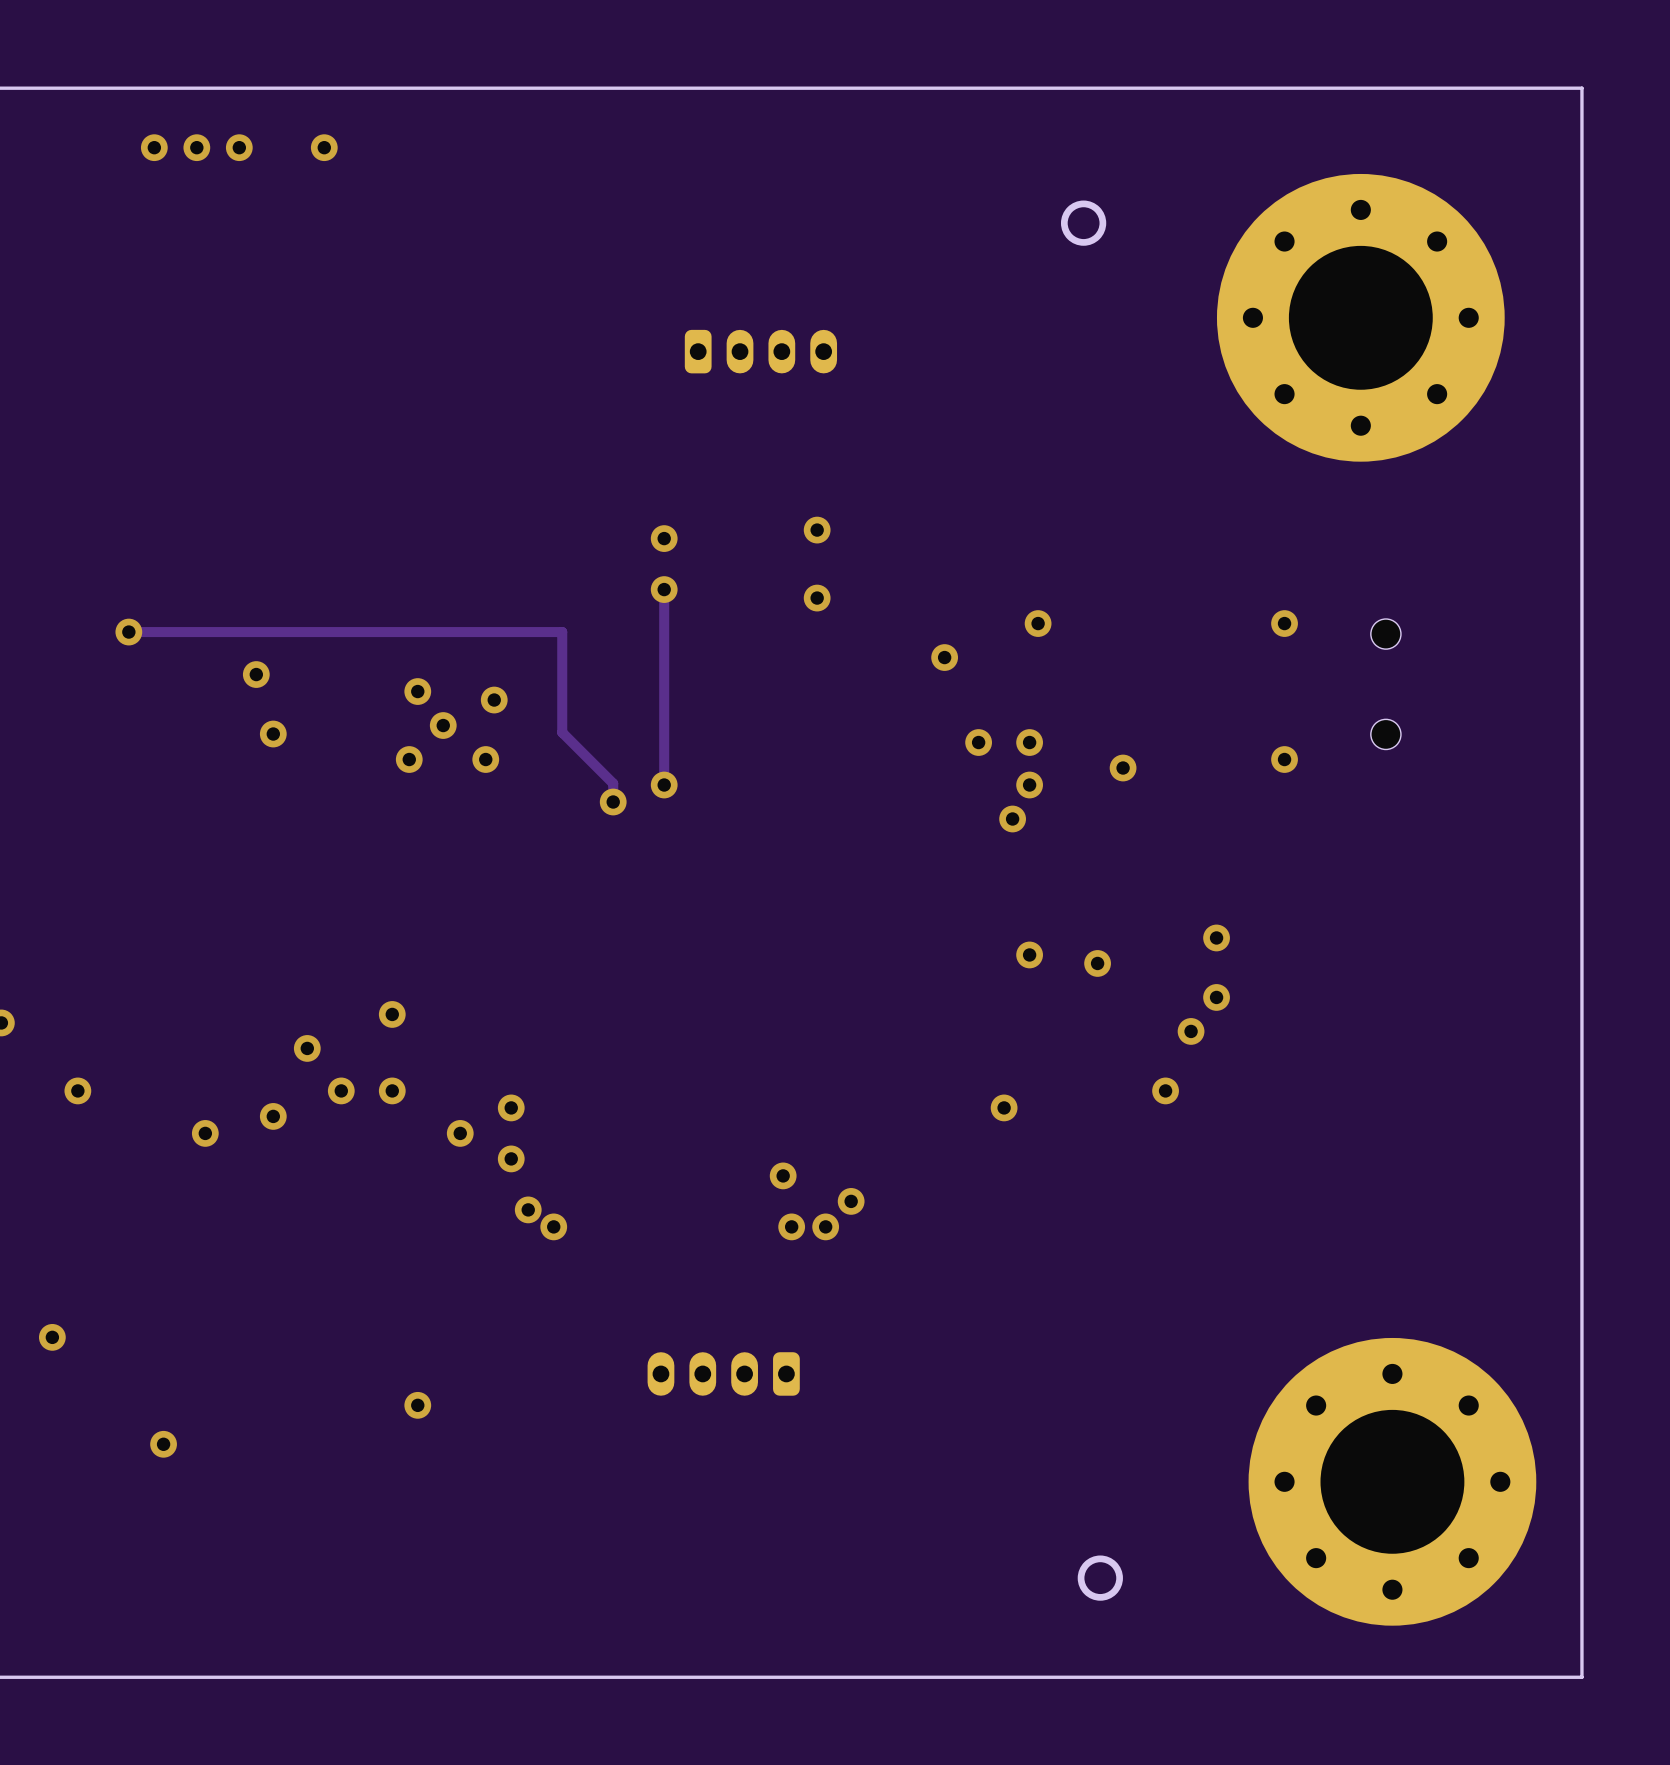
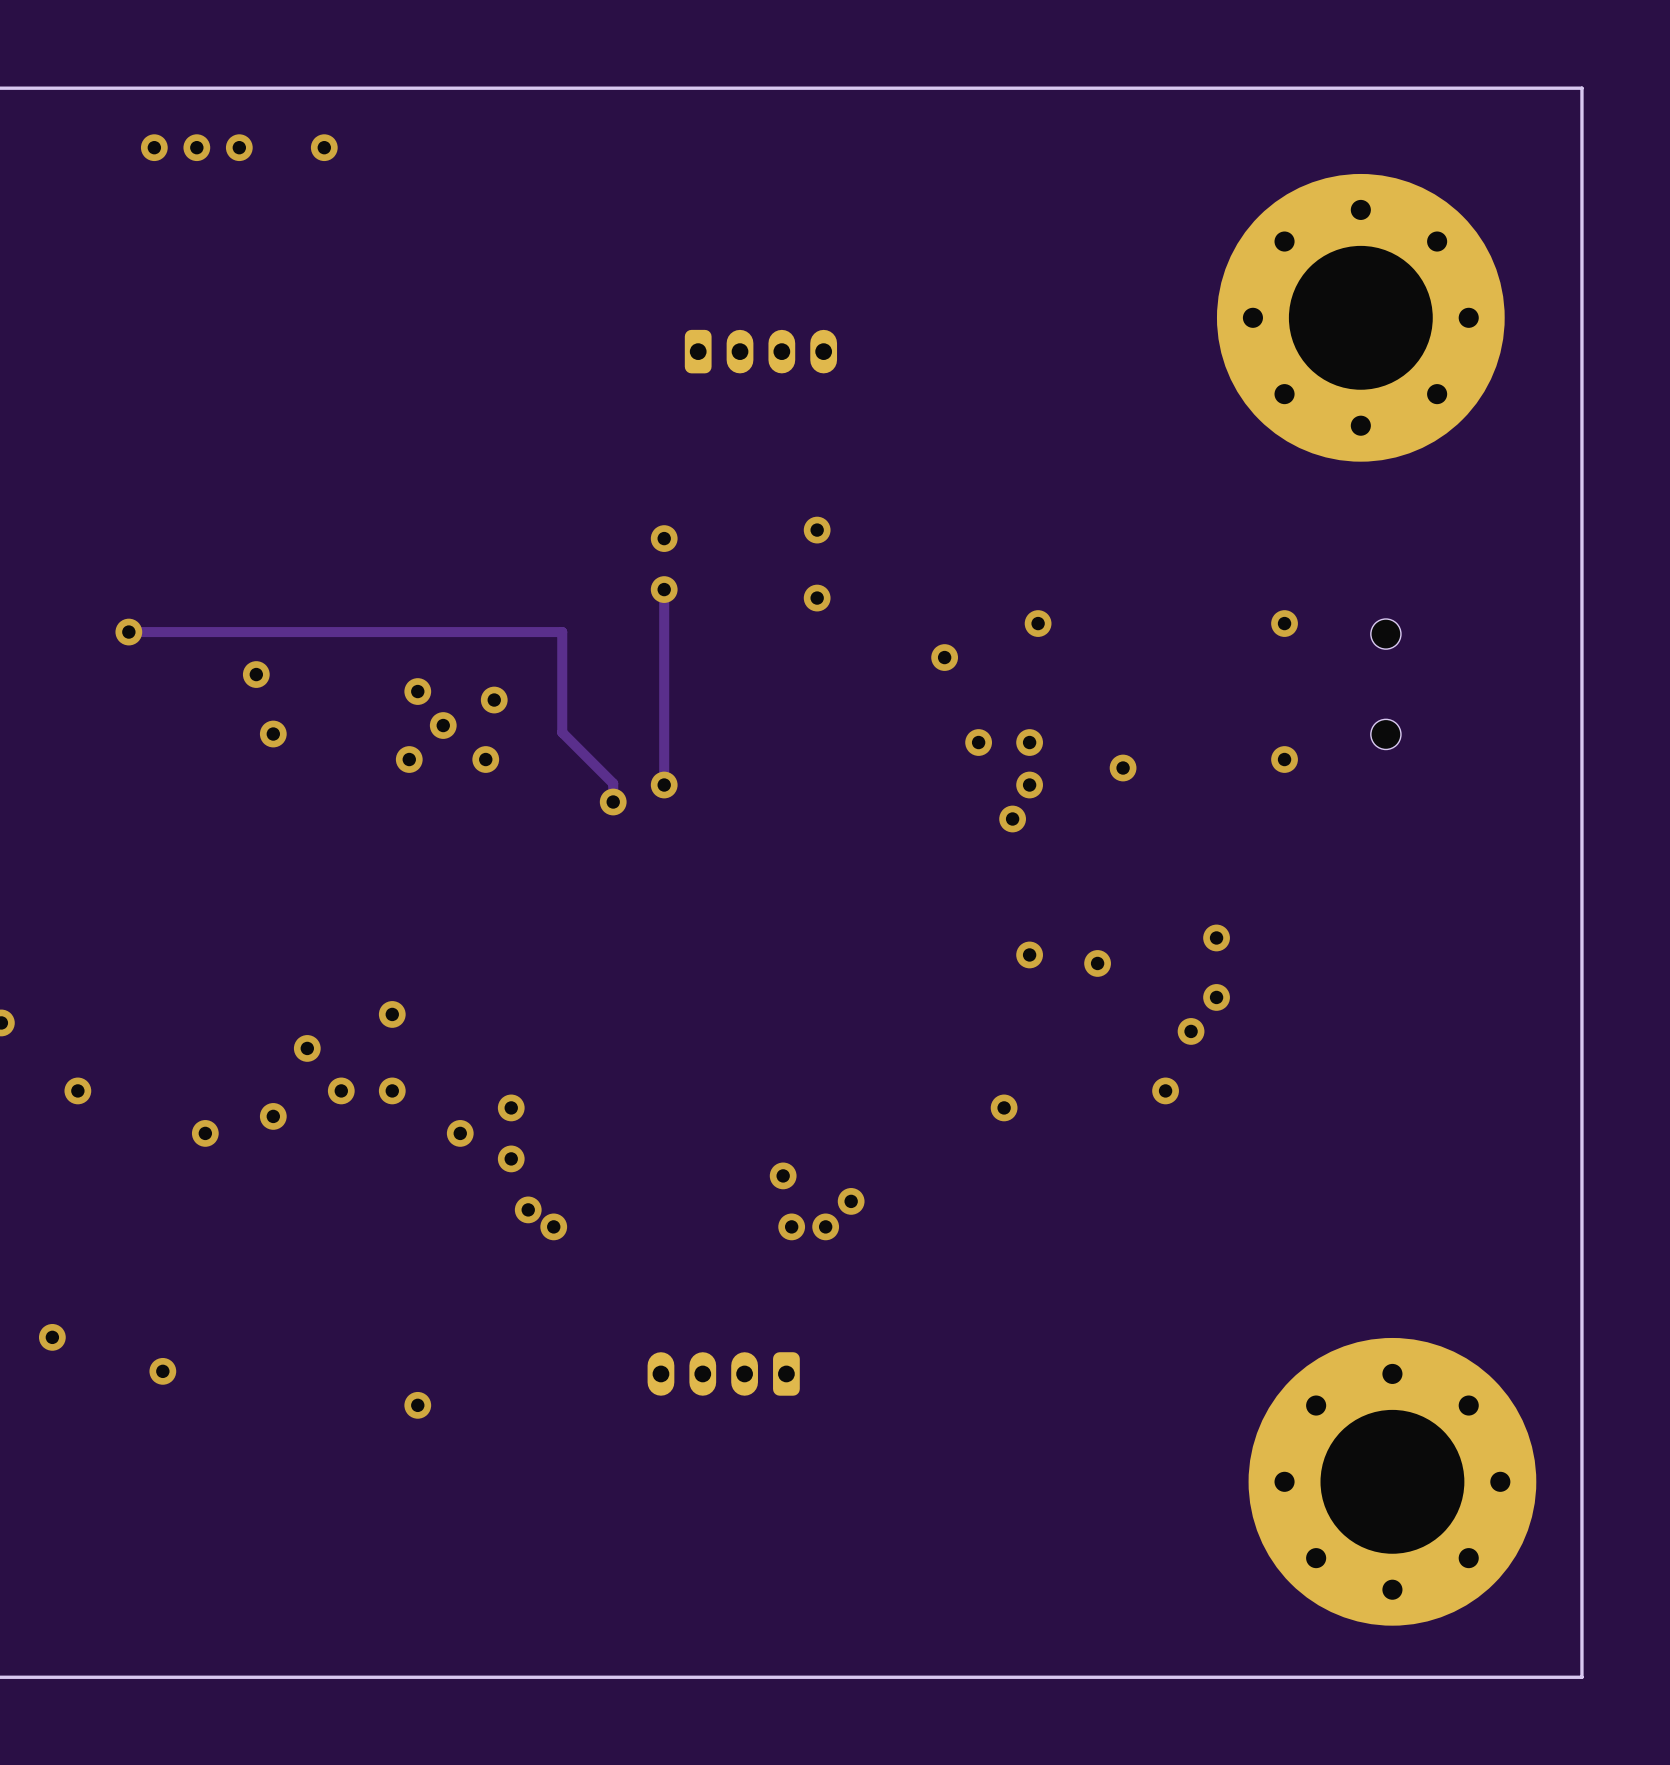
round board edge: [1060, 200, 1107, 246] -> none
via position: (163, 1444) -> (162, 1371)
round board edge: [1077, 1555, 1123, 1601] -> none

